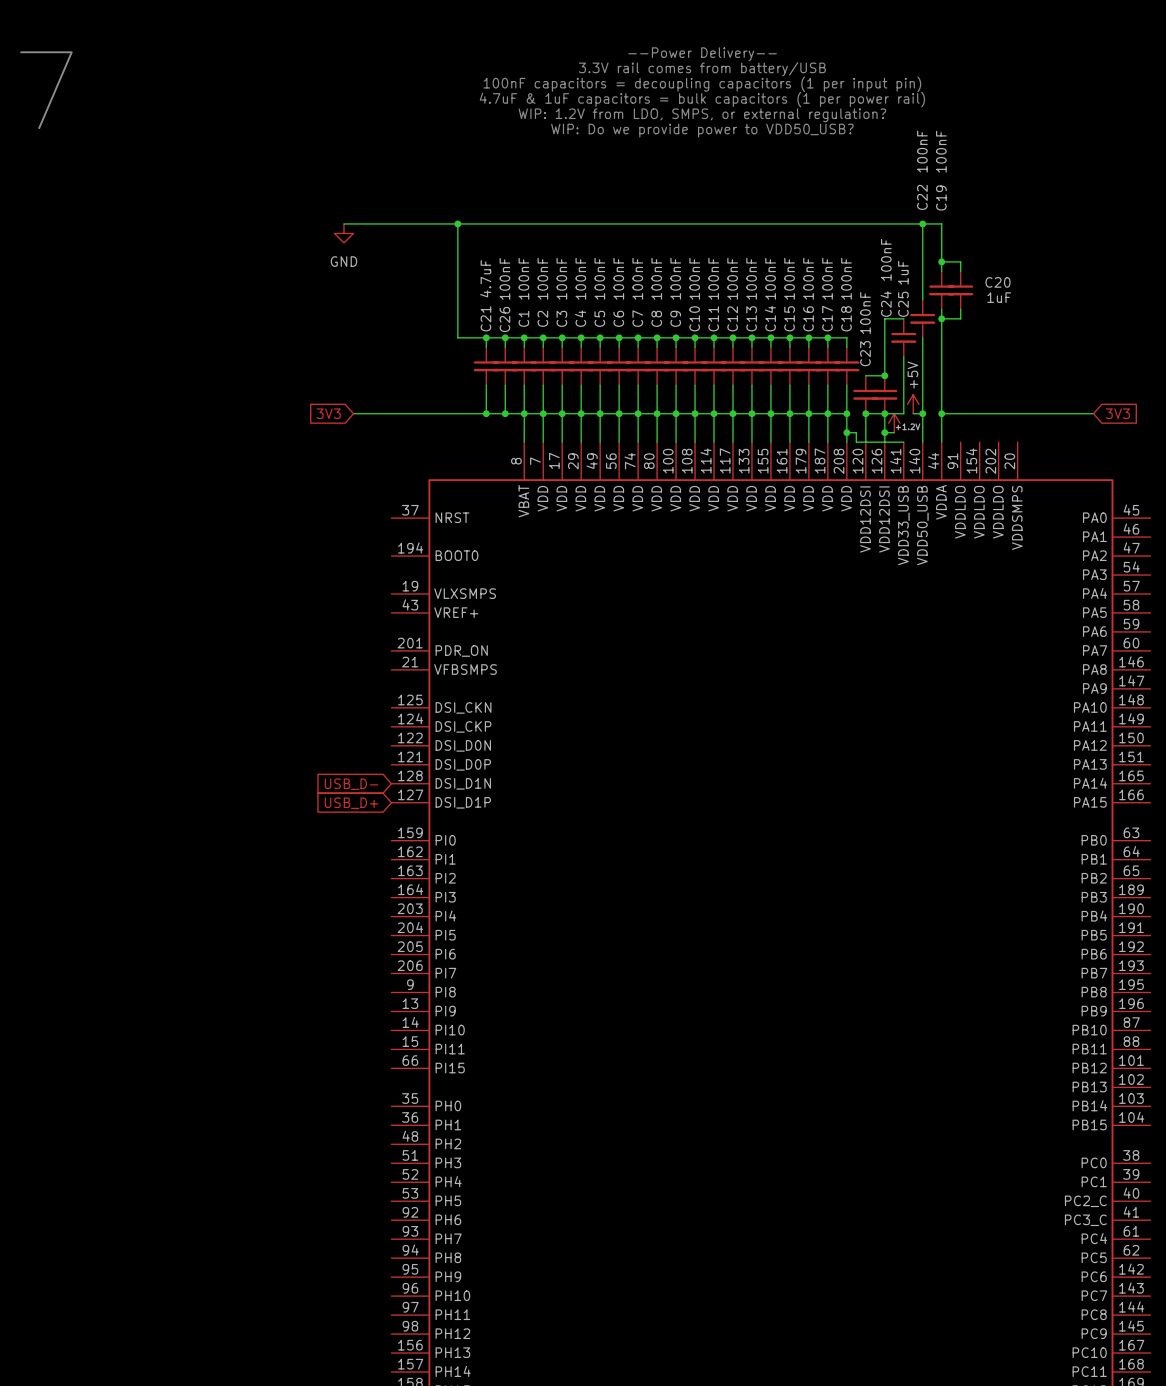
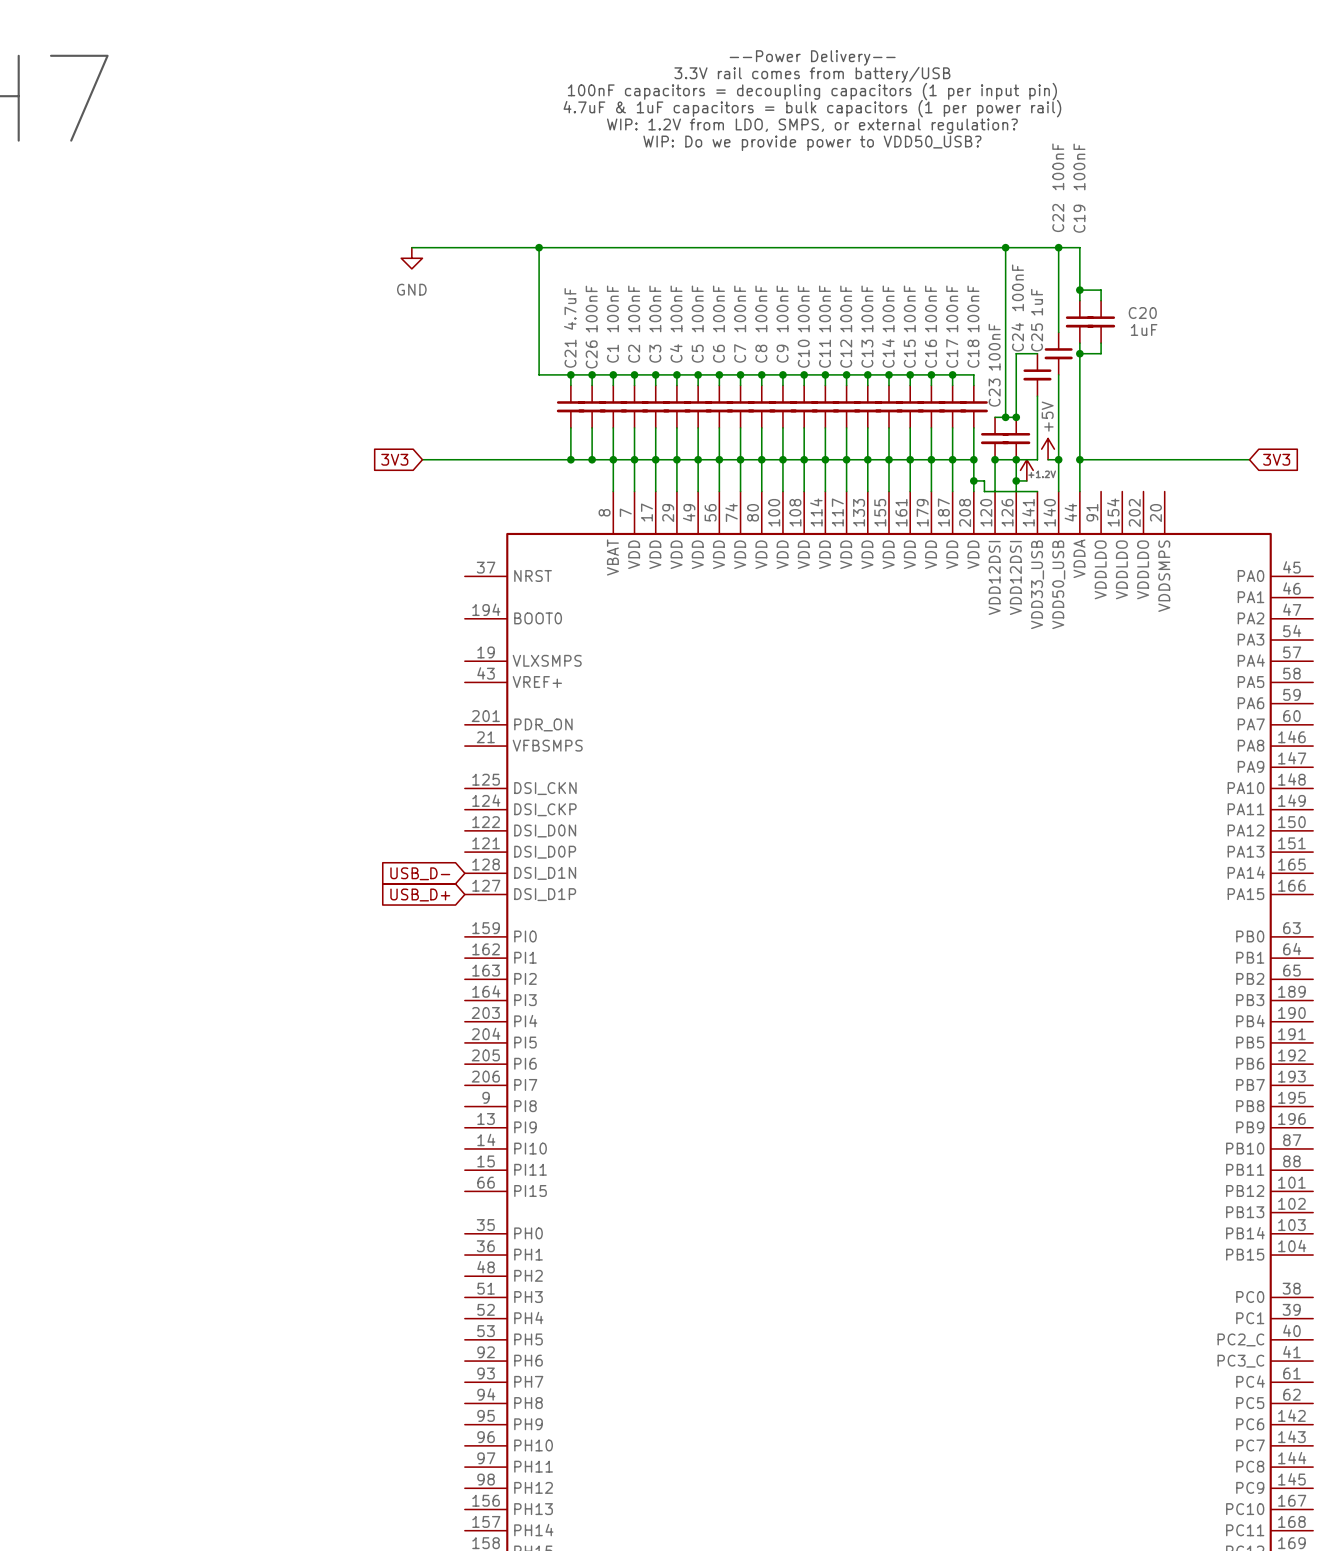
wire: none -> (1005, 247) (1005, 417)
junction: none -> (1005, 247)
junction: none -> (1005, 417)

